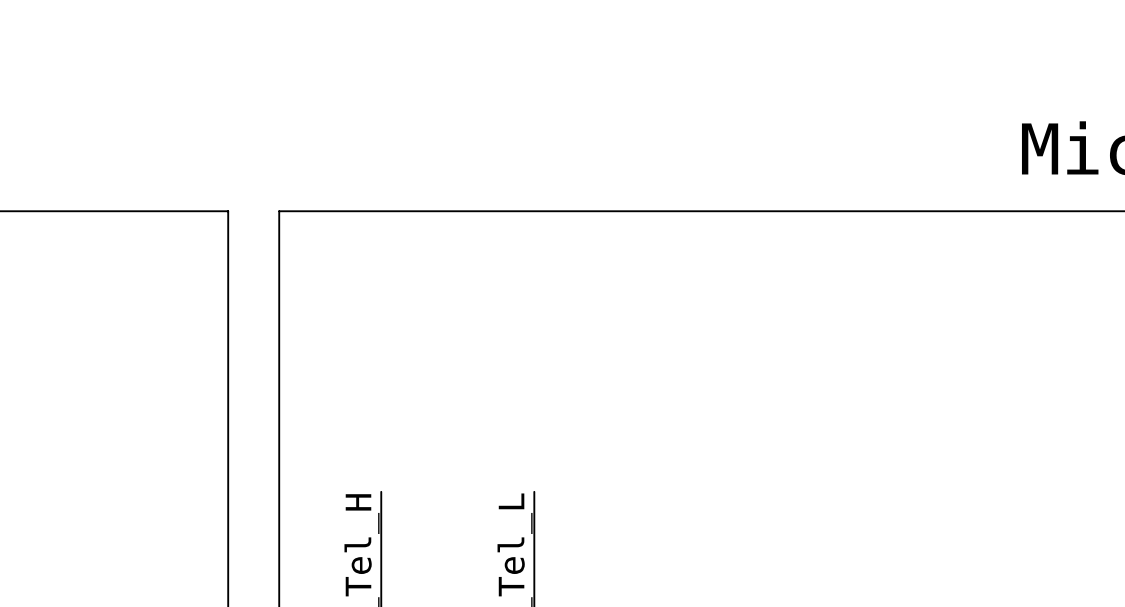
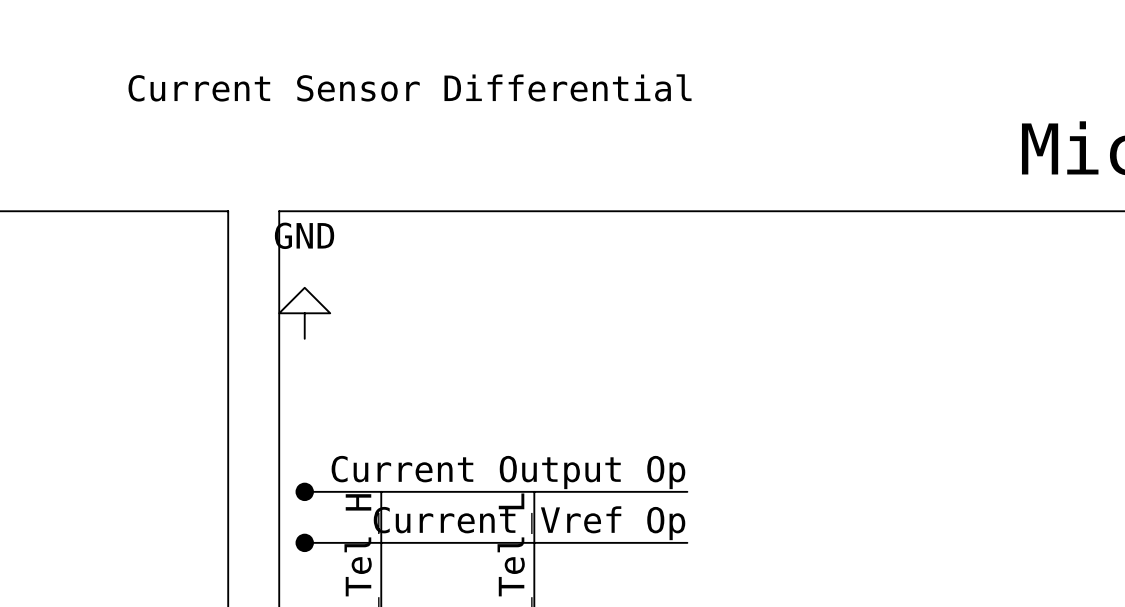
text: none -> Current Sensor Differential (410, 87)
power symbol: none -> GND (304, 313)
label: none -> Current Output Op (508, 472)
wire: none -> (304, 491) (687, 491)
junction: none -> (304, 491)
label: none -> Current Vref Op (529, 523)
wire: none -> (304, 542) (687, 542)
junction: none -> (304, 542)

